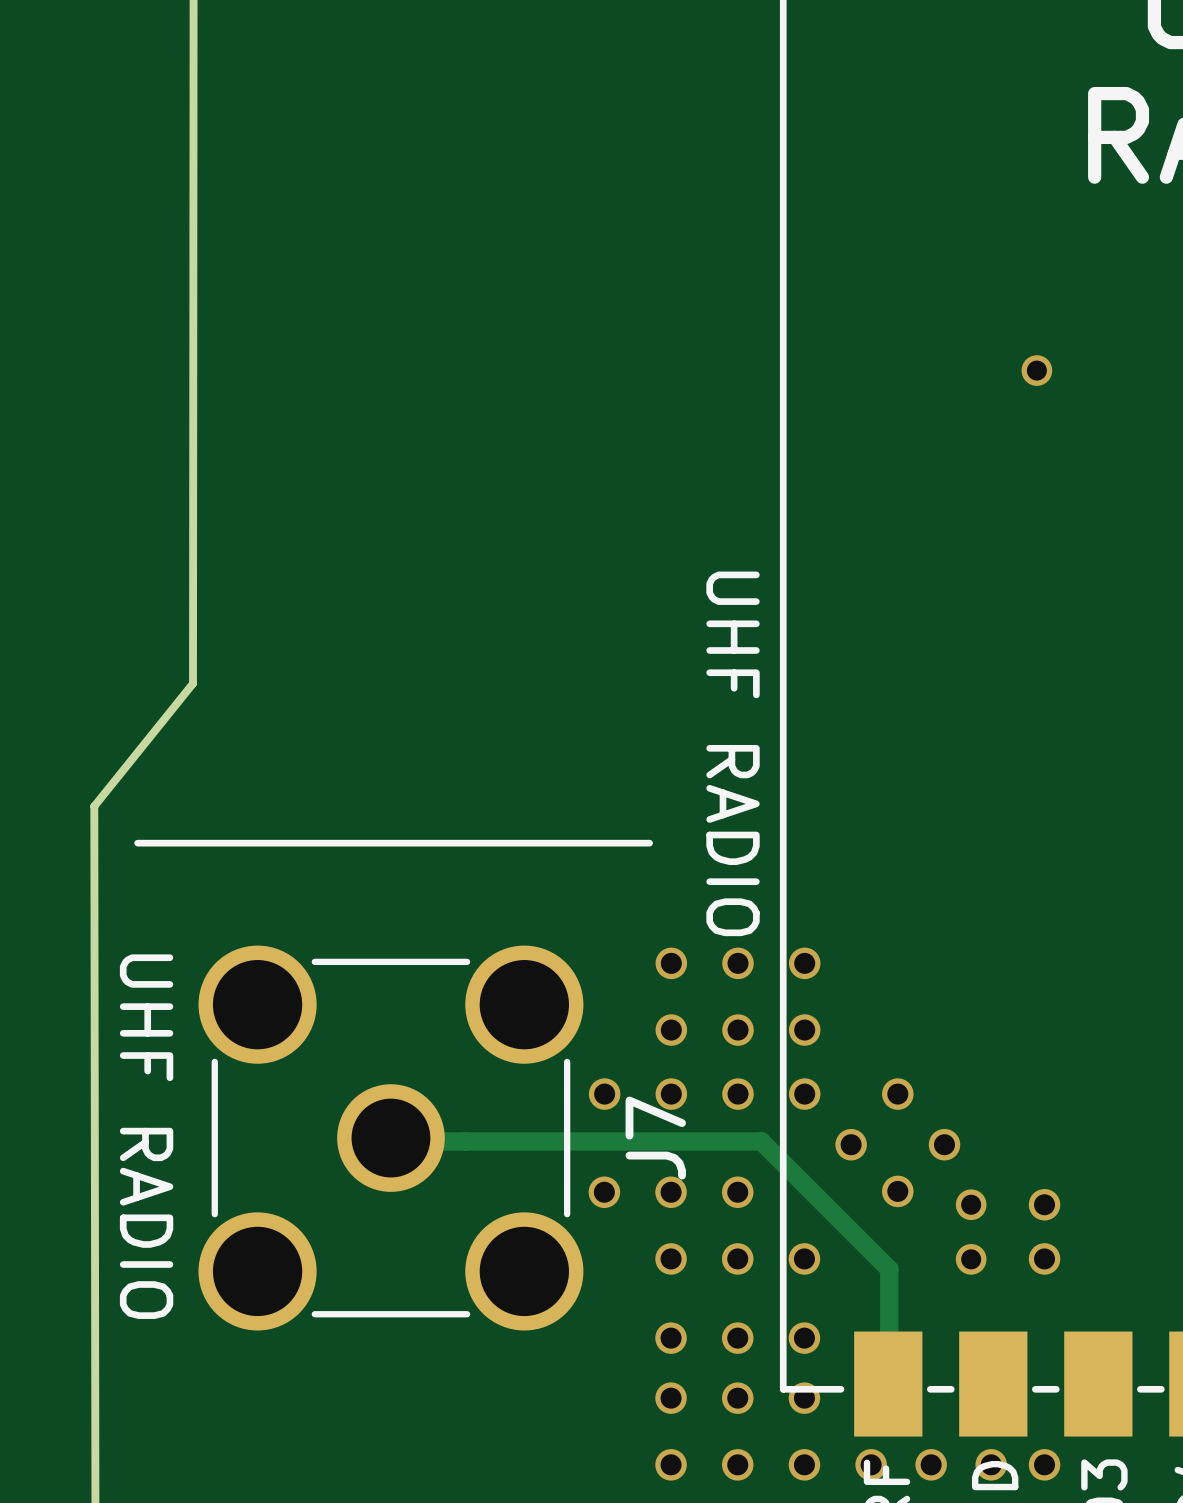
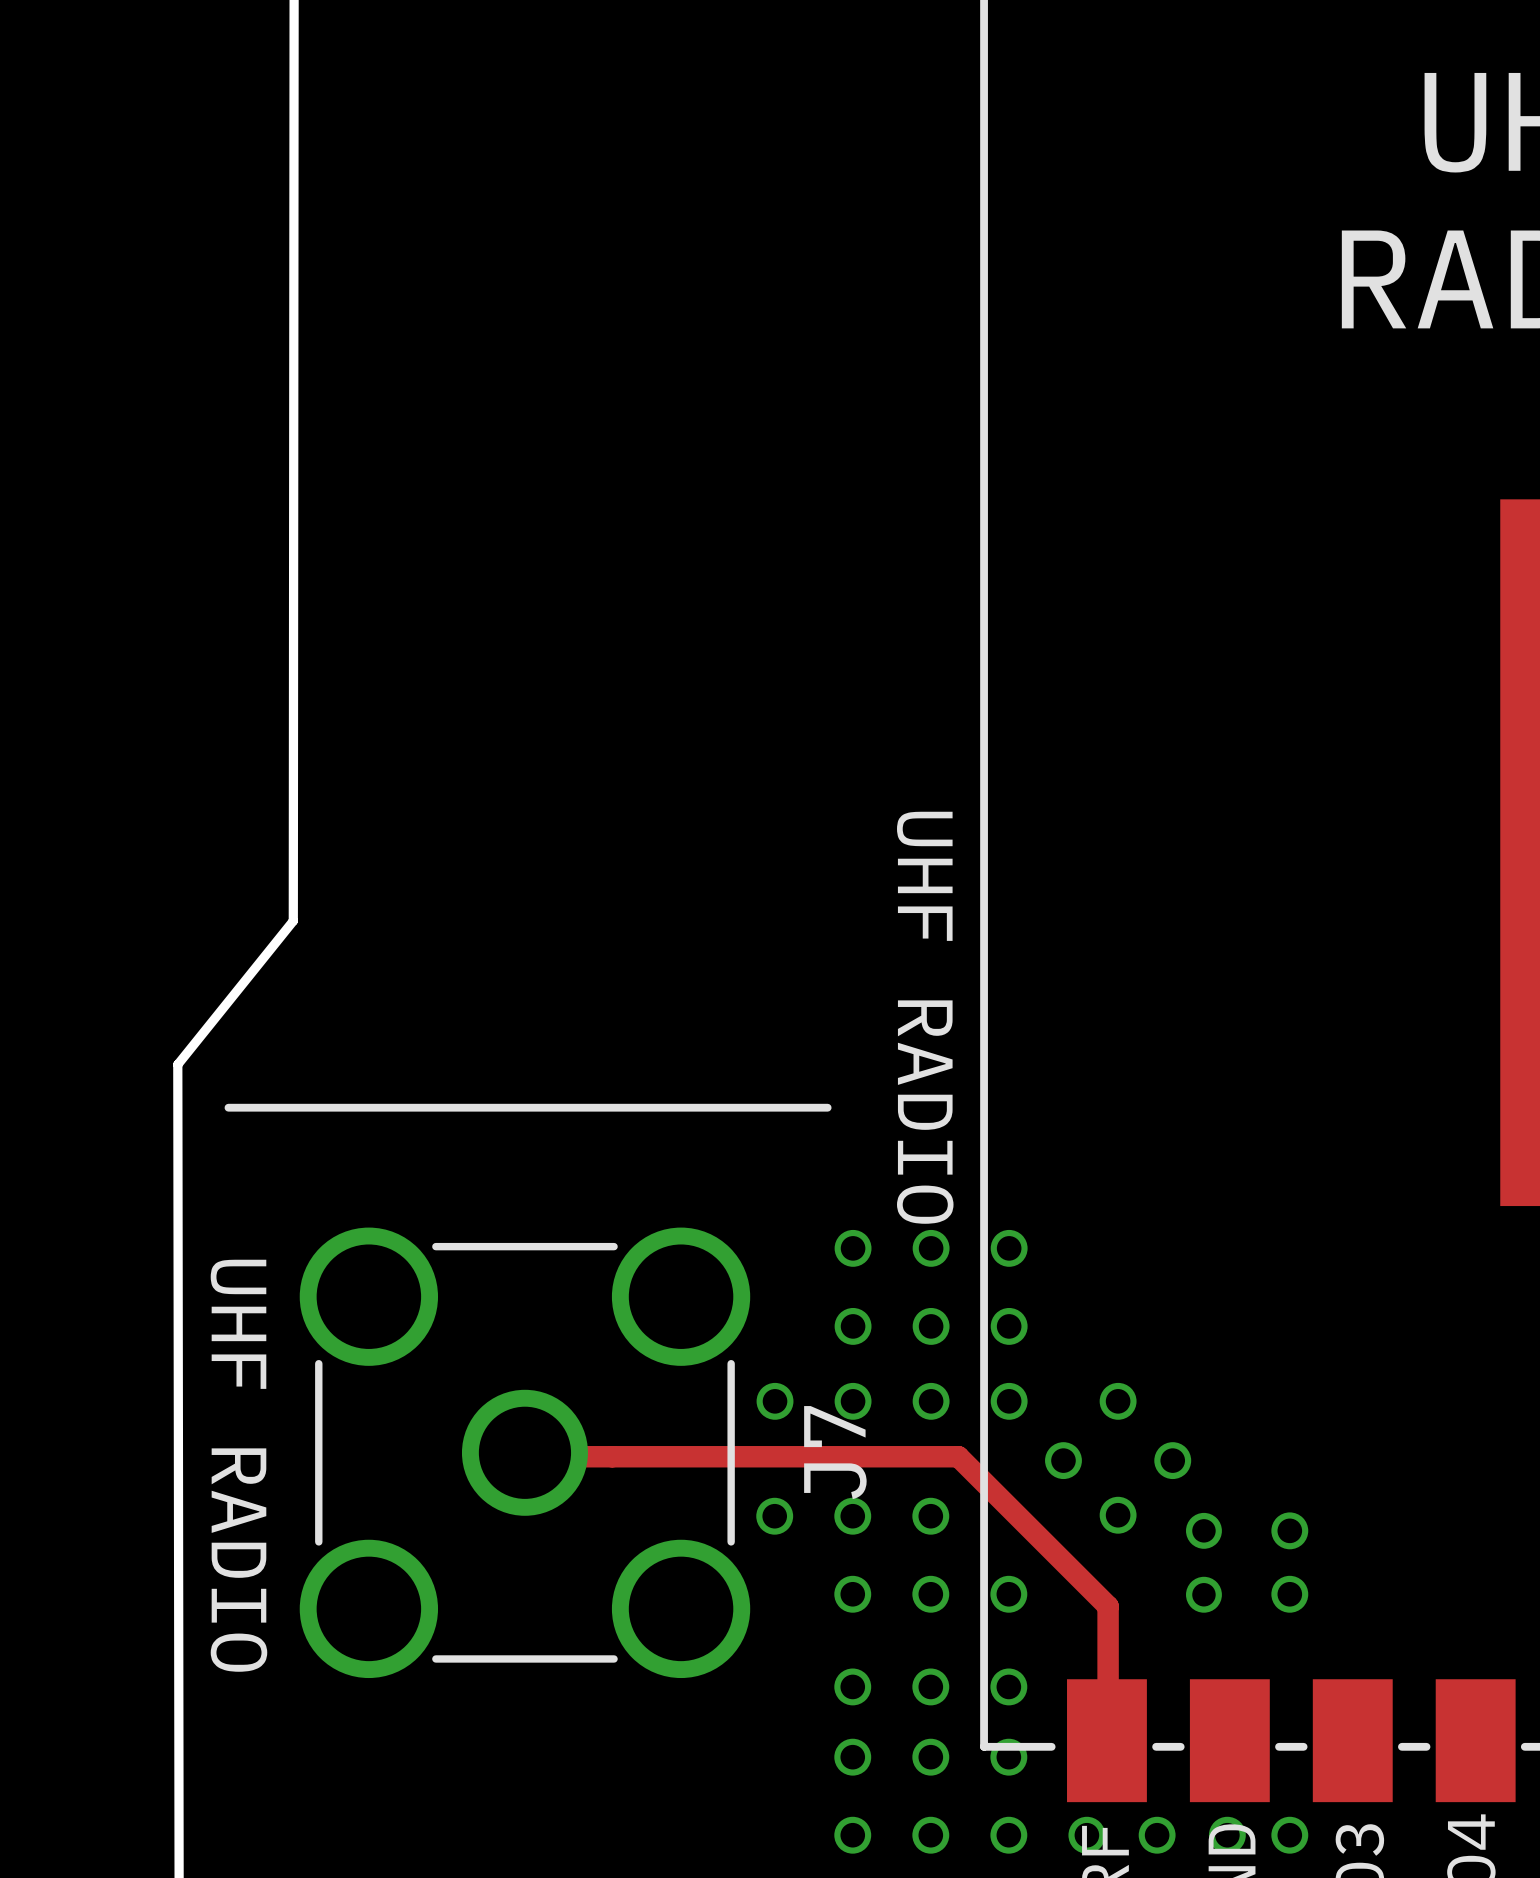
via: (1036, 370) -> none

